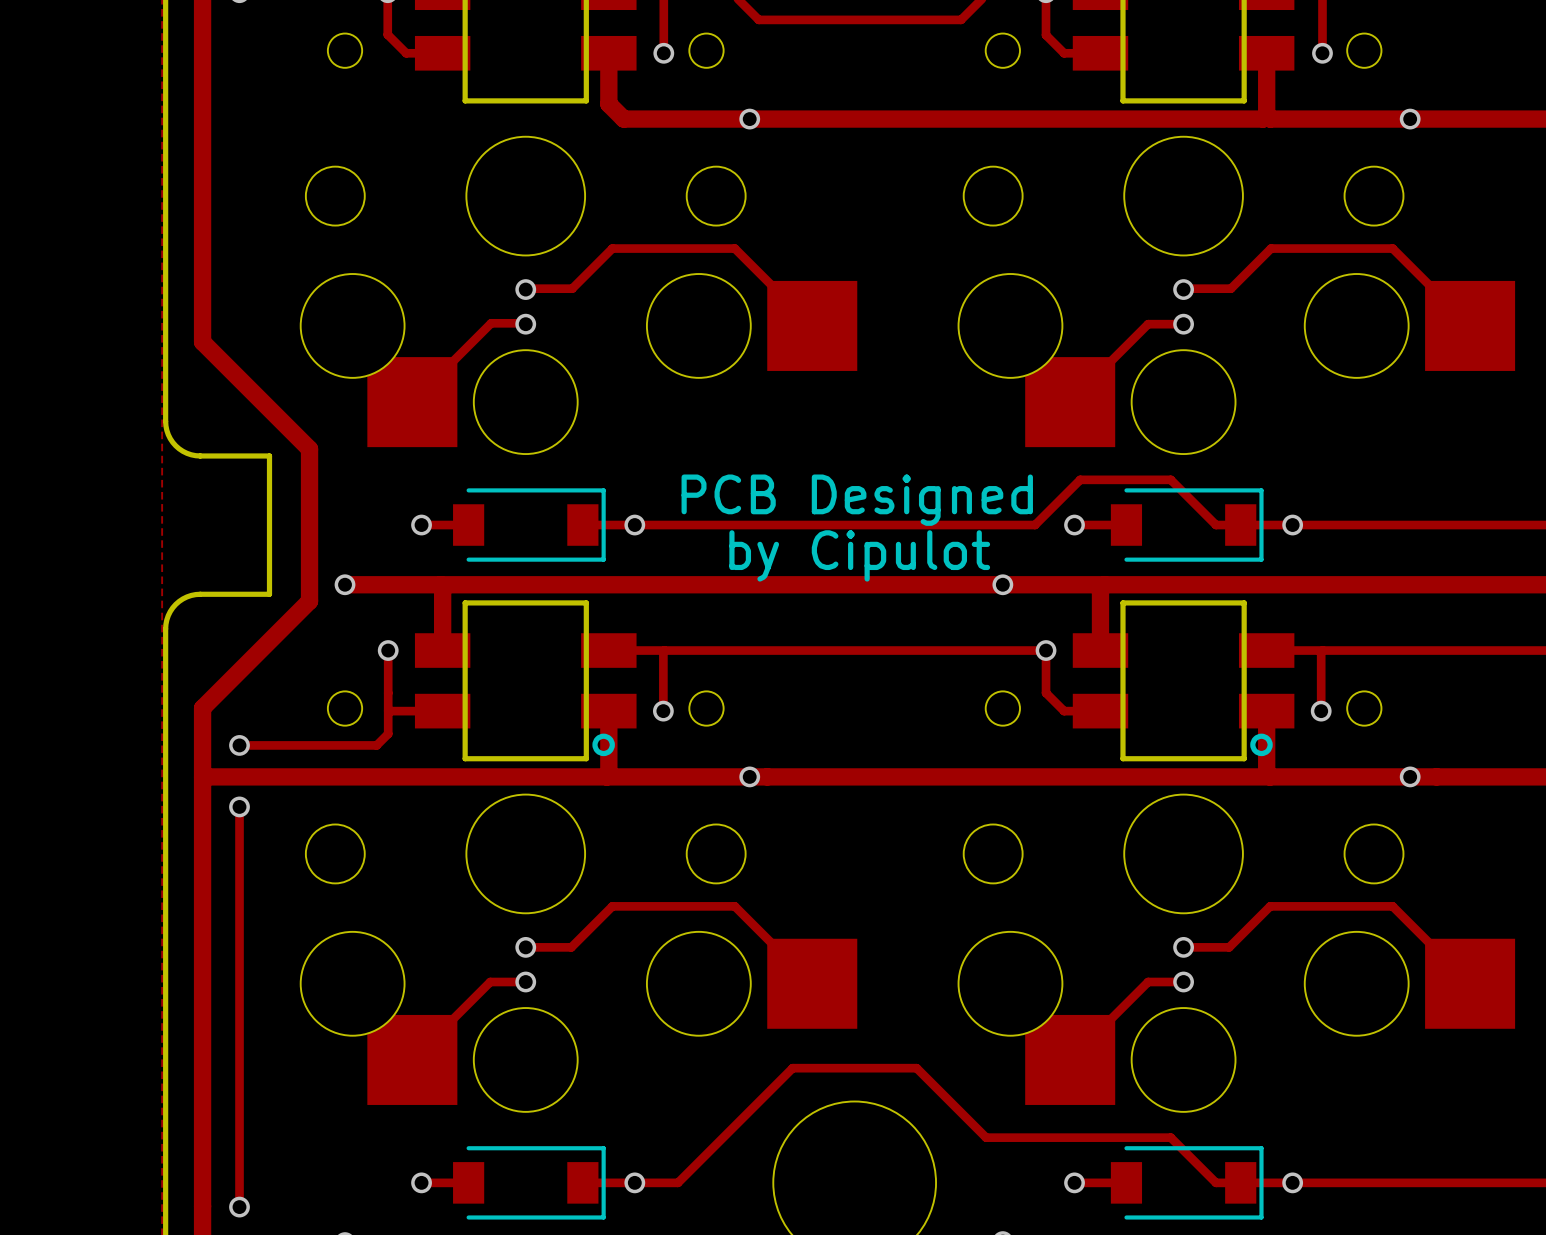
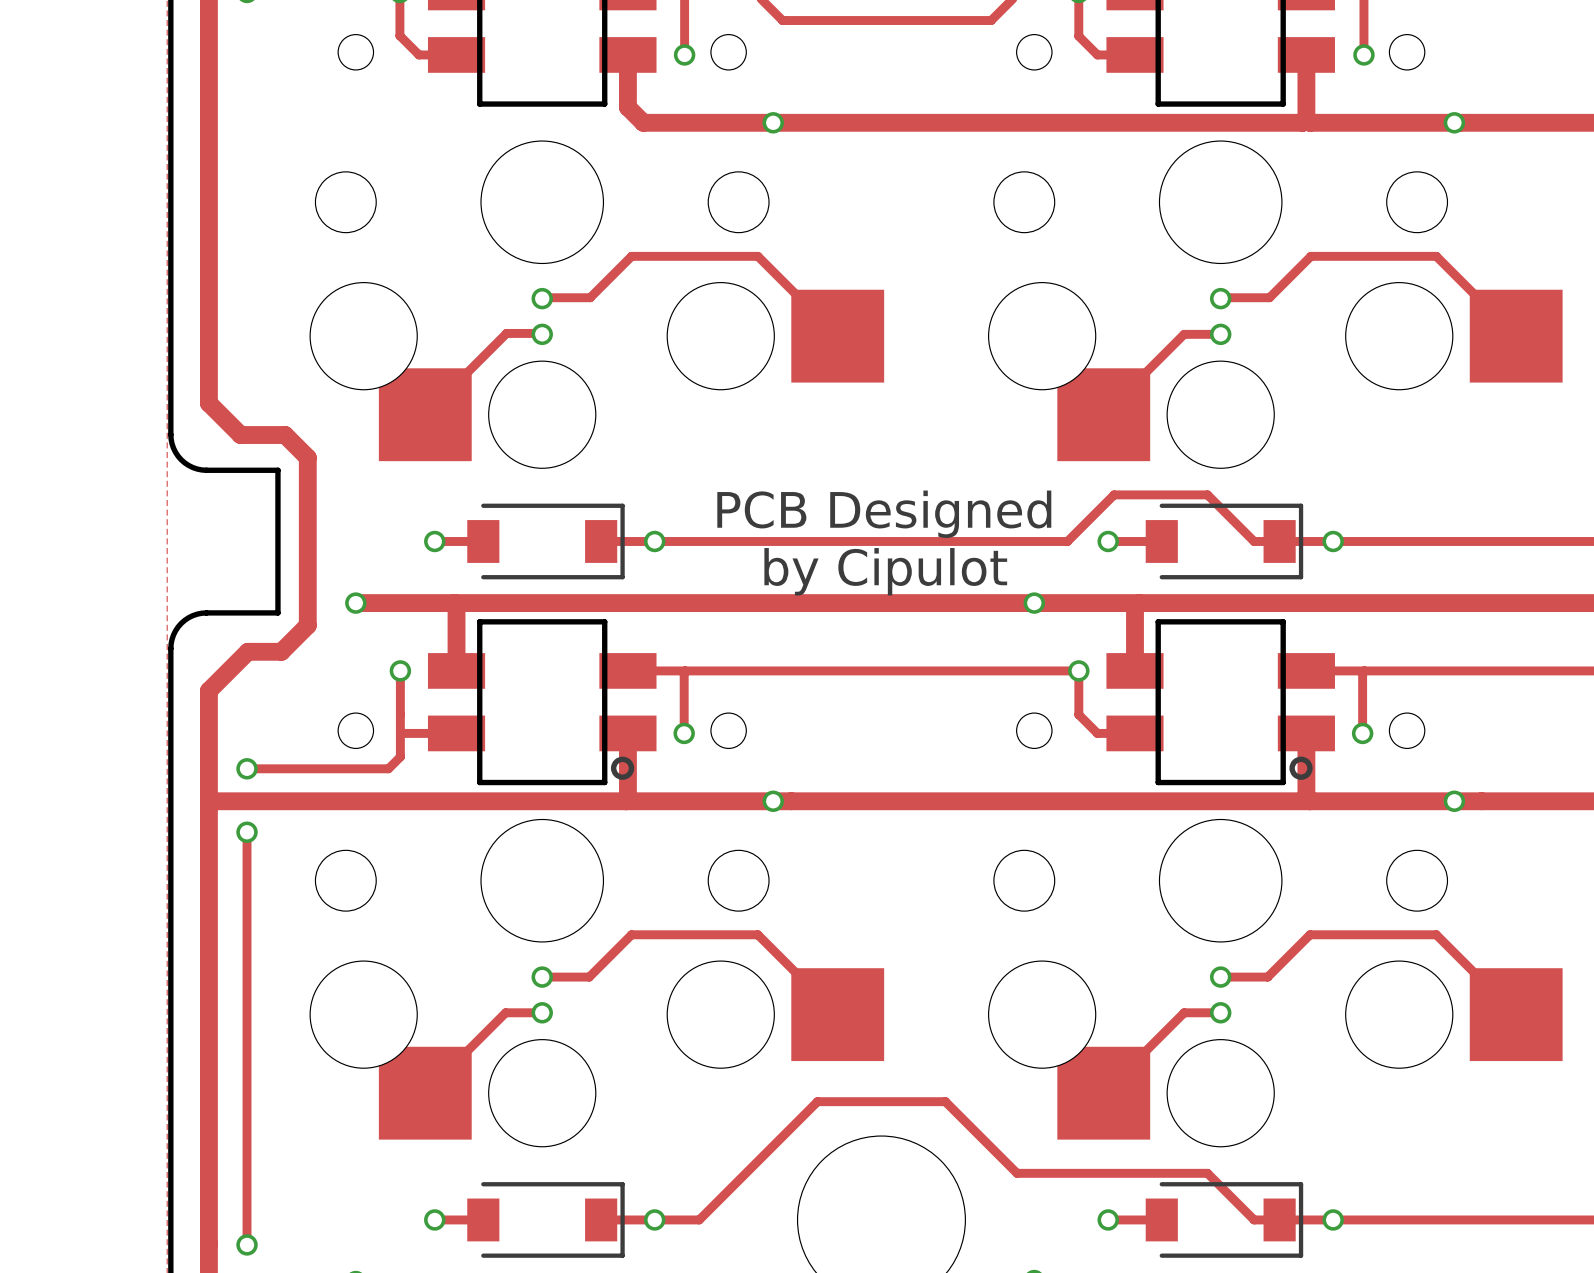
track: (202, 342) (309, 449) (309, 601) (202, 708) -> (208, 352) (208, 403) (240, 435) (285, 435) (307, 457) (307, 625) (281, 651) (247, 651) (208, 690) (208, 730)

